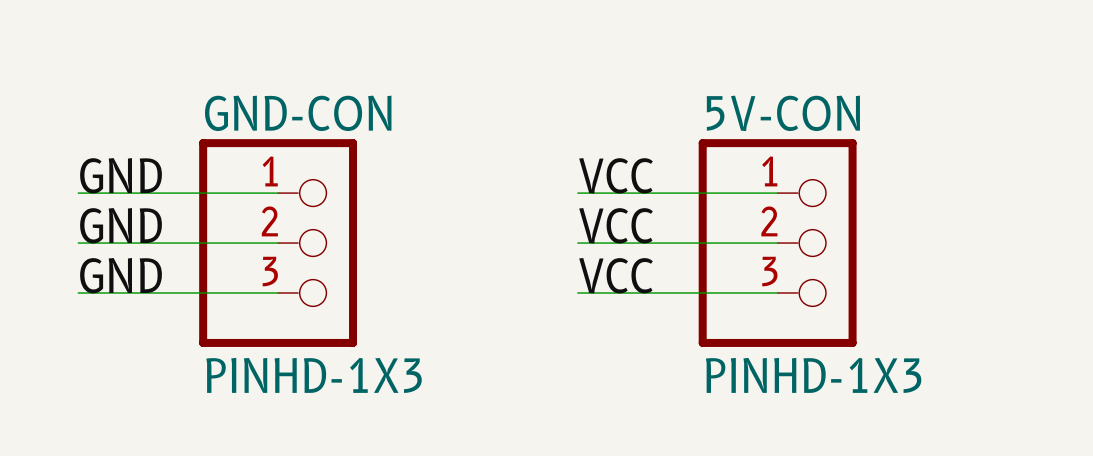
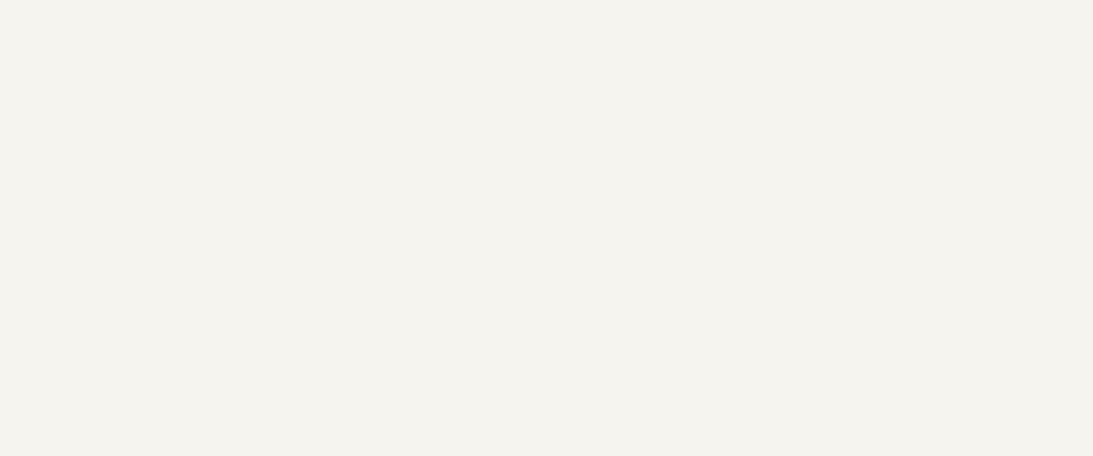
label: GND (121, 175) -> none
label: VCC (616, 175) -> none
wire: (78, 193) (278, 193) -> none
wire: (577, 193) (777, 193) -> none
label: GND (121, 225) -> none
label: VCC (616, 225) -> none
wire: (78, 243) (278, 243) -> none
GND-CON: PINHD-1X3 (278, 243) -> none
wire: (577, 243) (777, 243) -> none
5V-CON: PINHD-1X3 (777, 243) -> none
label: GND (121, 275) -> none
label: VCC (616, 275) -> none
wire: (78, 292) (278, 292) -> none
wire: (577, 292) (777, 292) -> none

